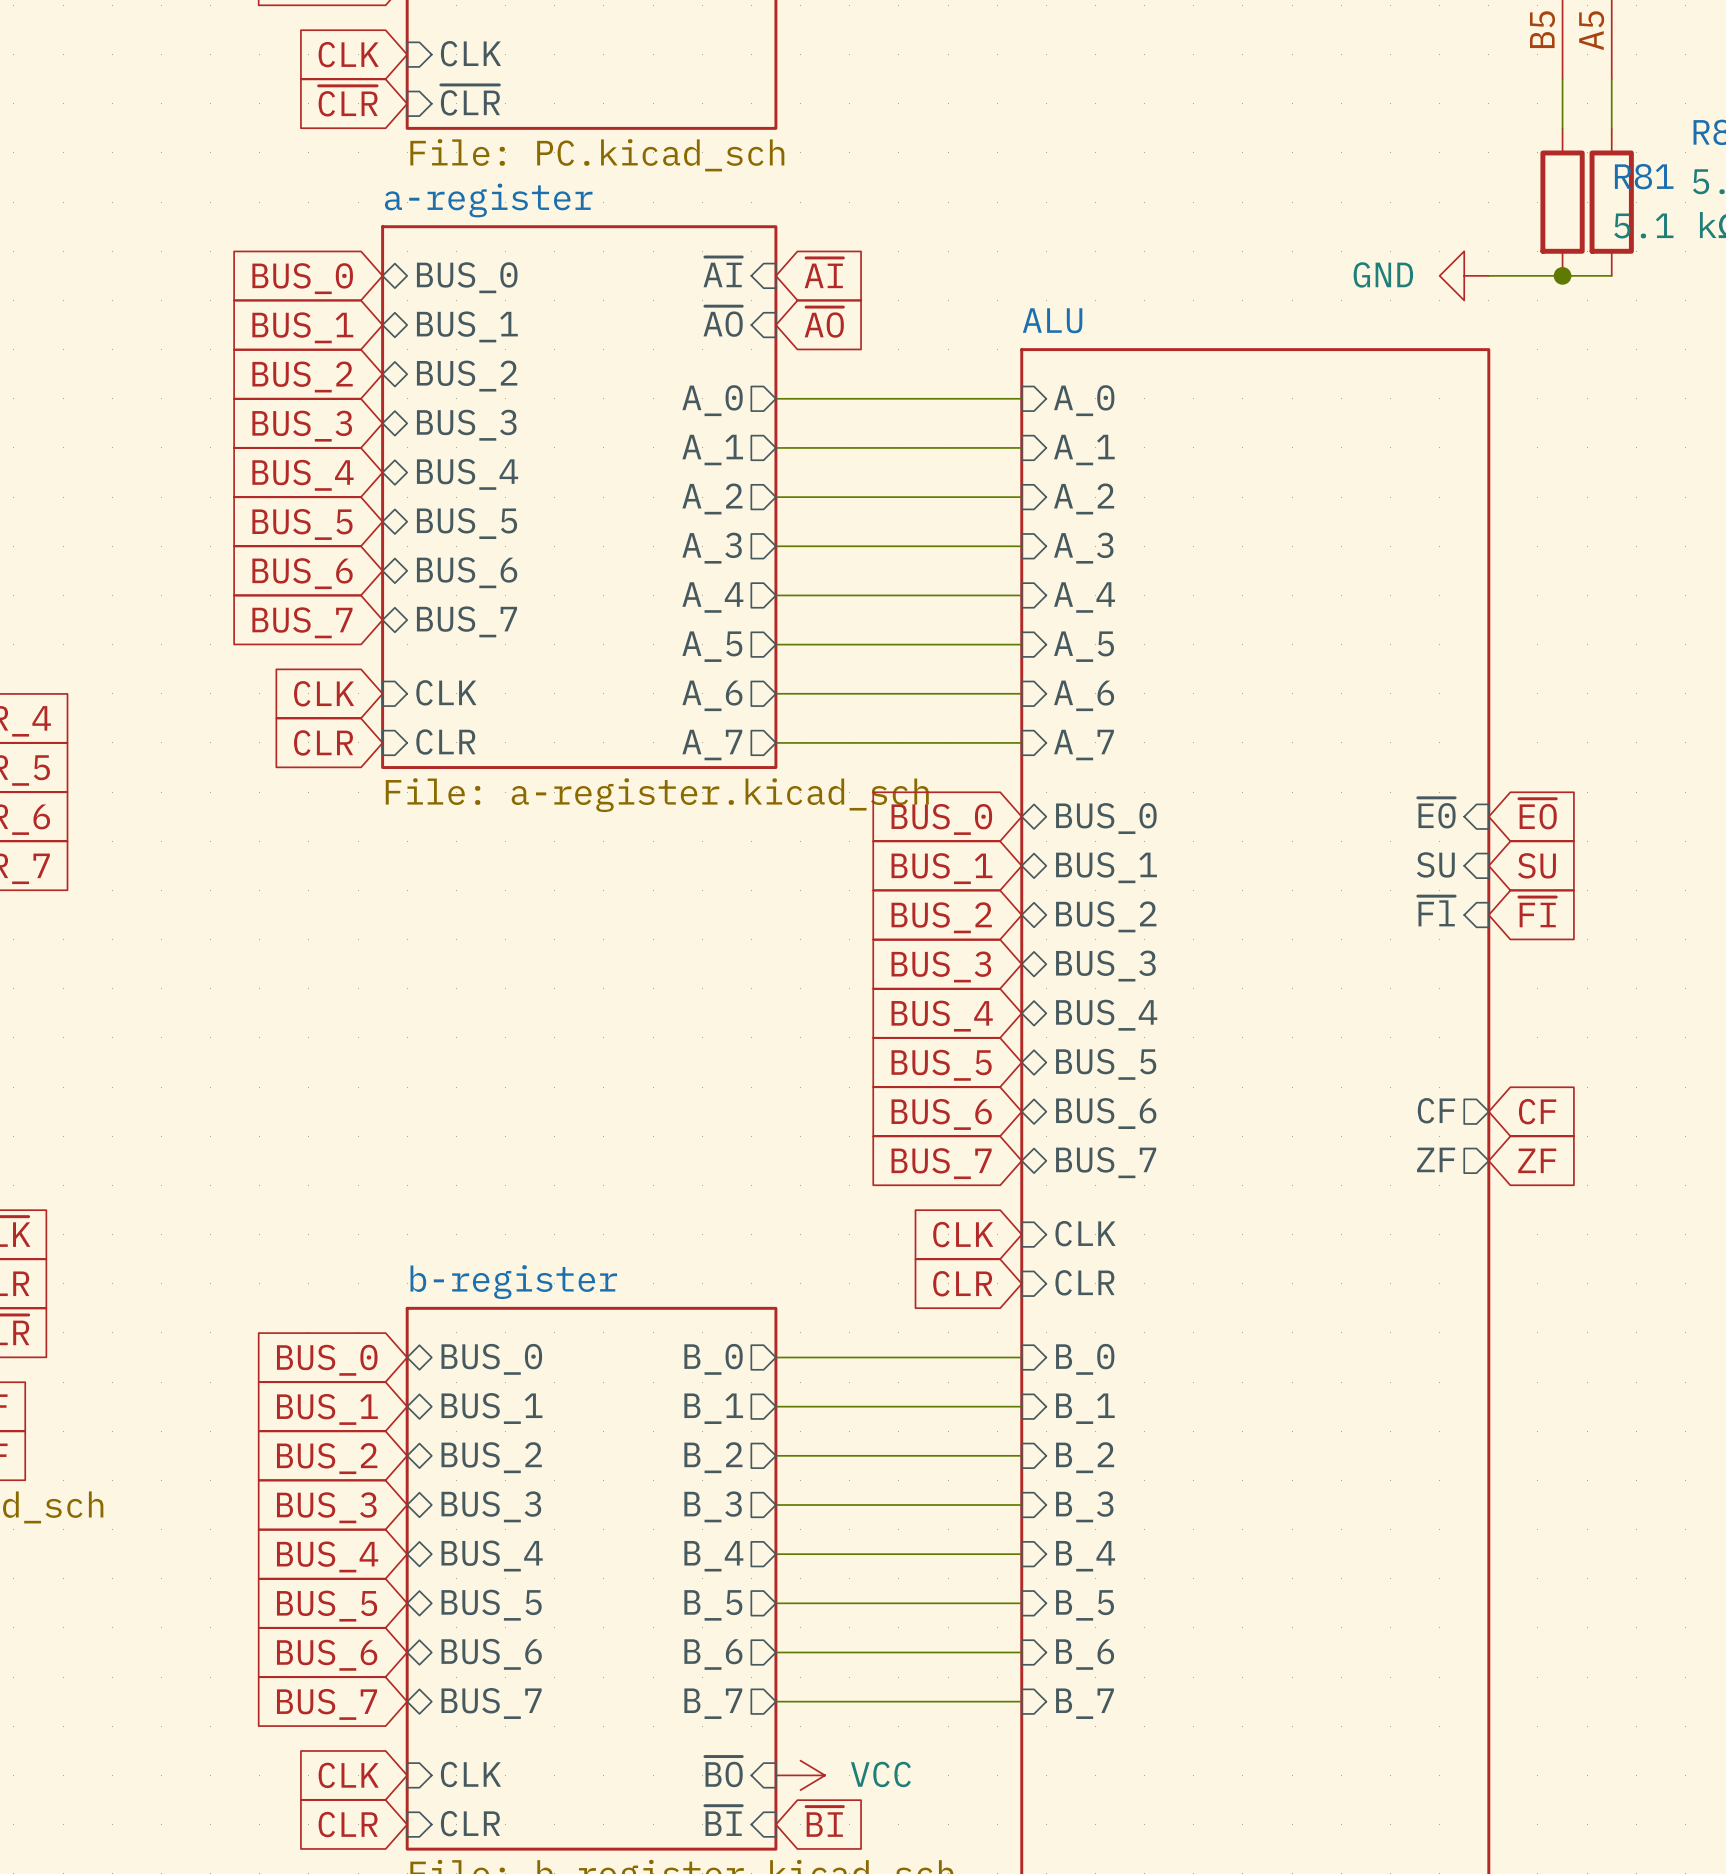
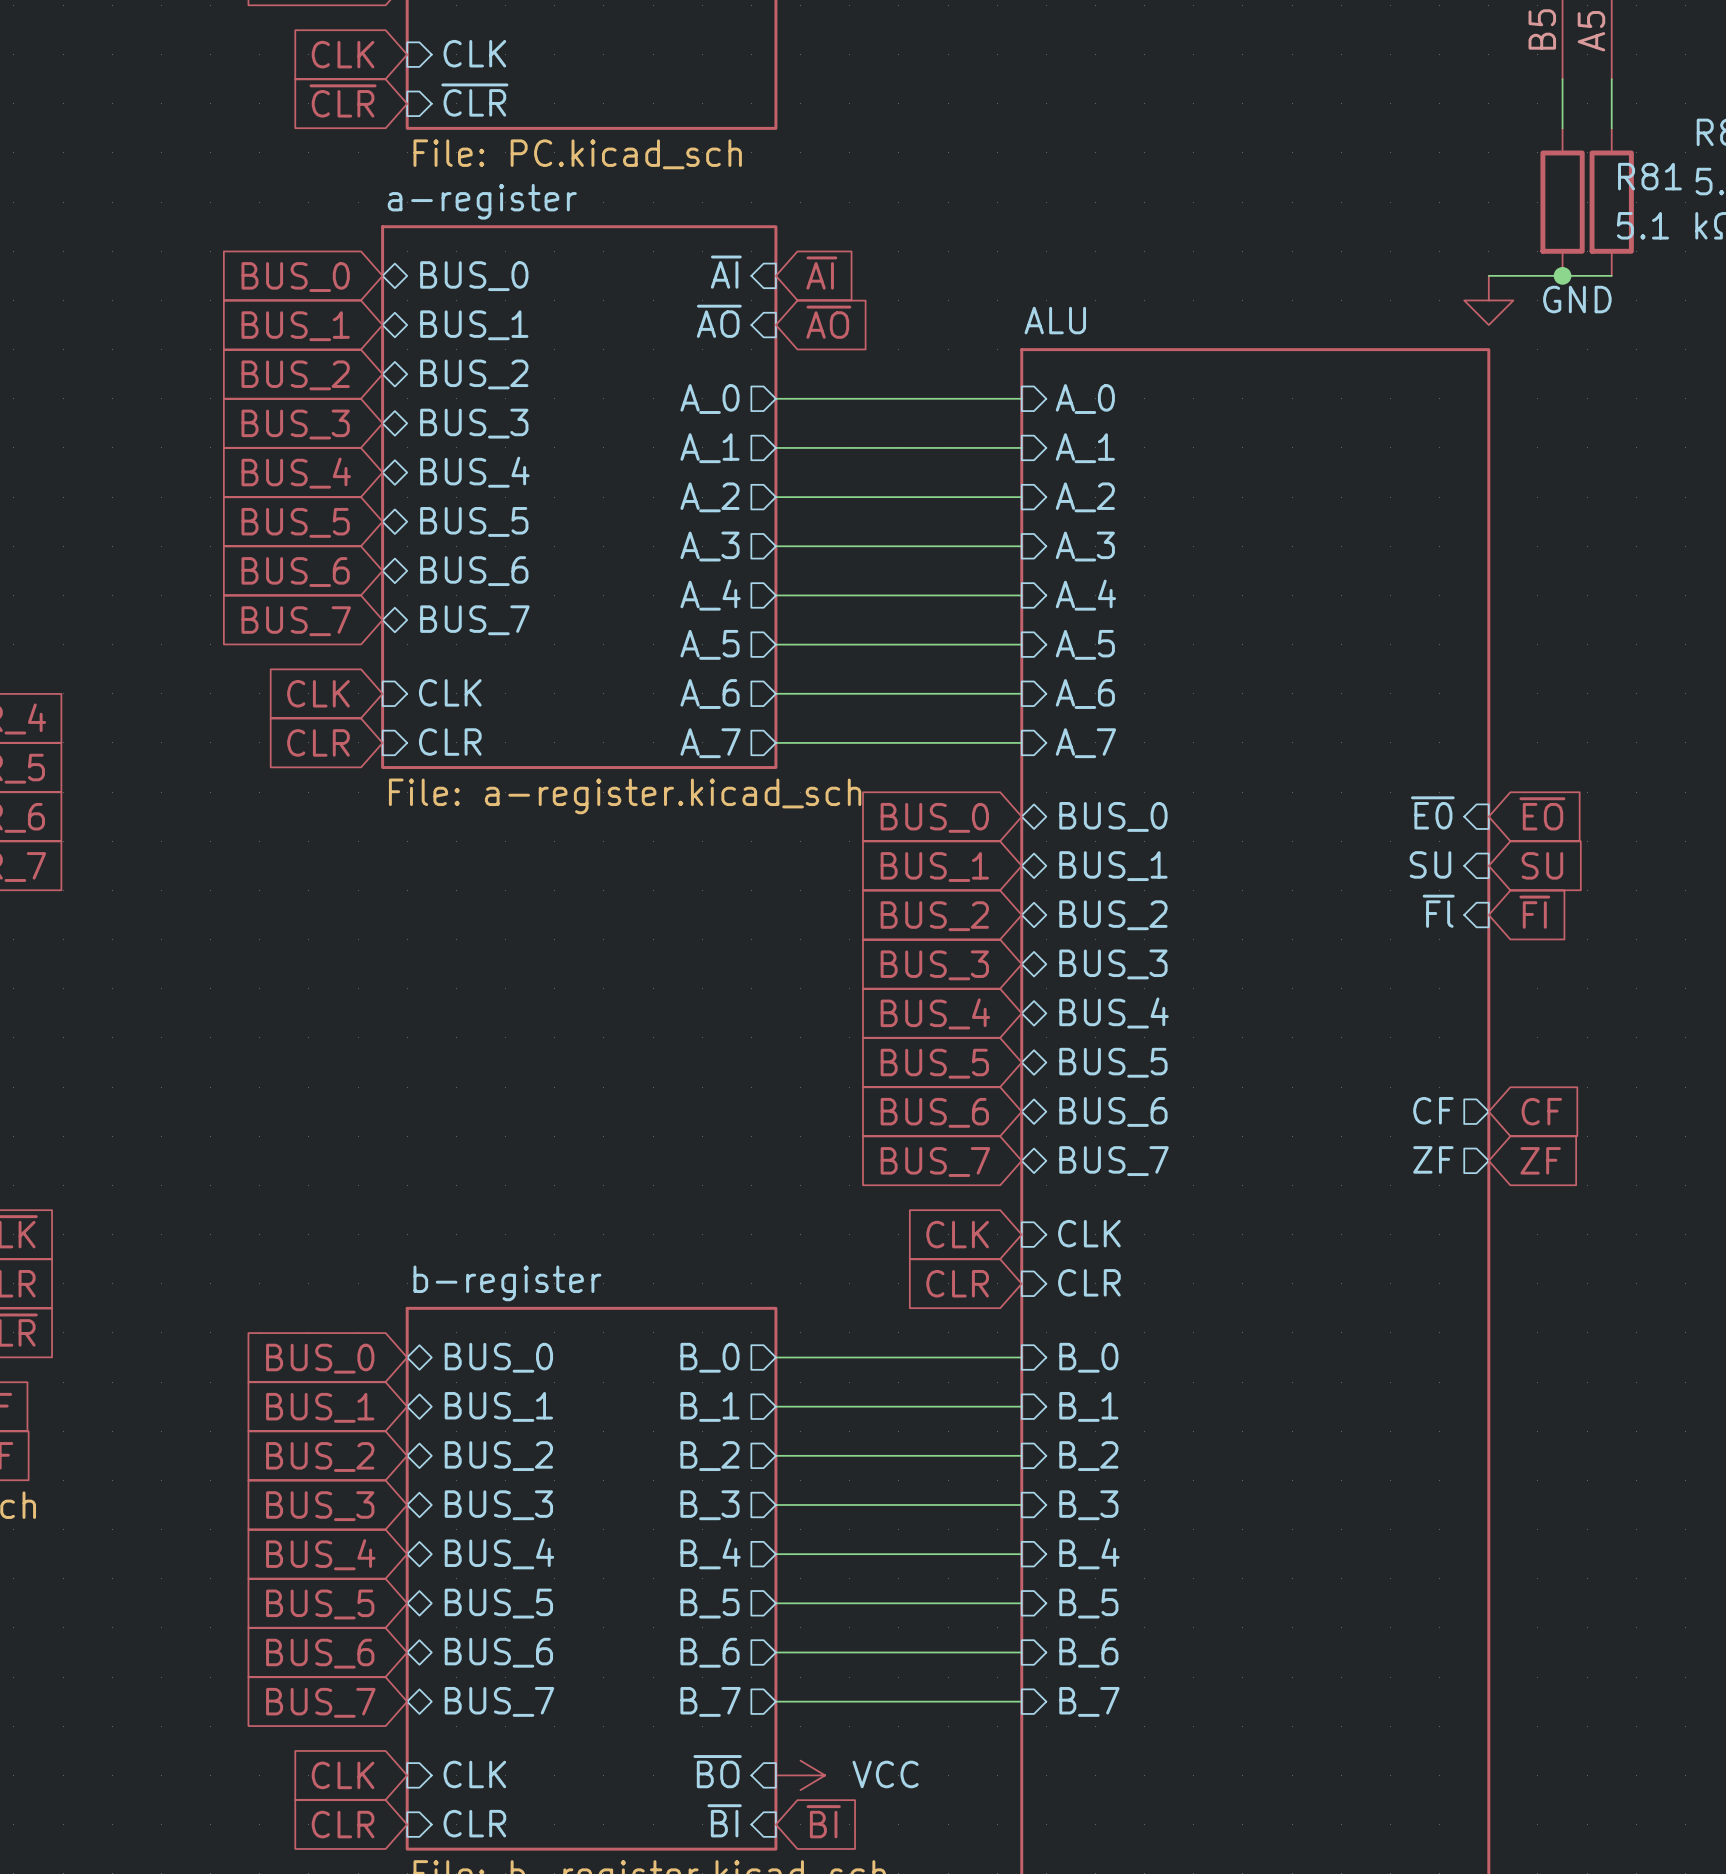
power symbol text position: GND (1383, 274) -> GND (1577, 299)
power symbol rotation: 0° (1464, 275) -> 90° counterclockwise (1488, 300)
power symbol position: GND (1464, 275) -> GND (1488, 300)

